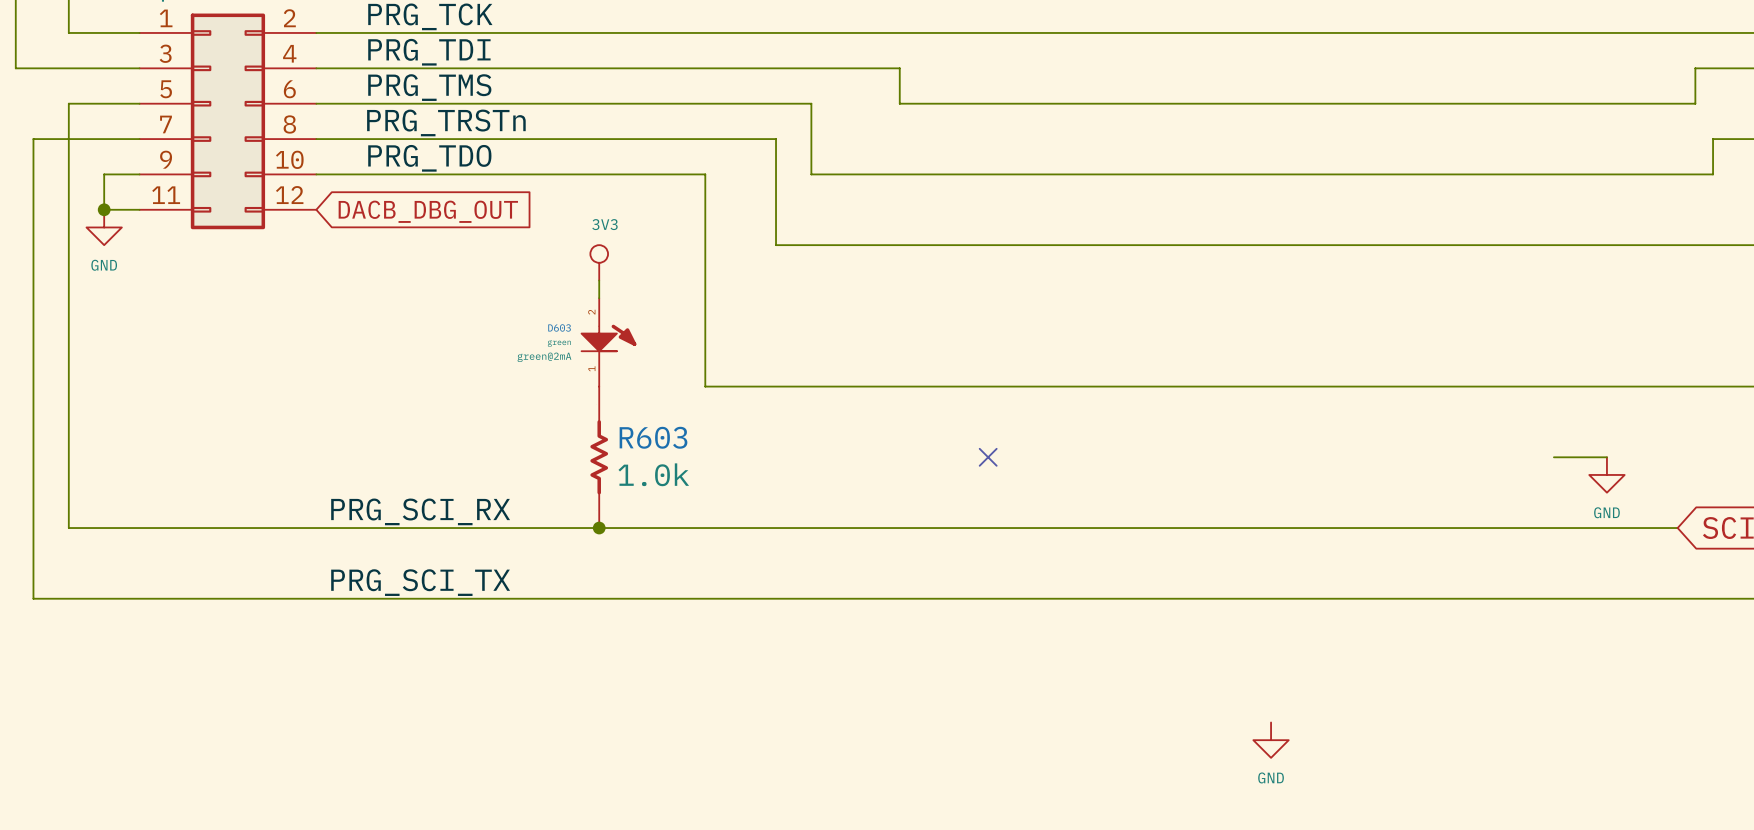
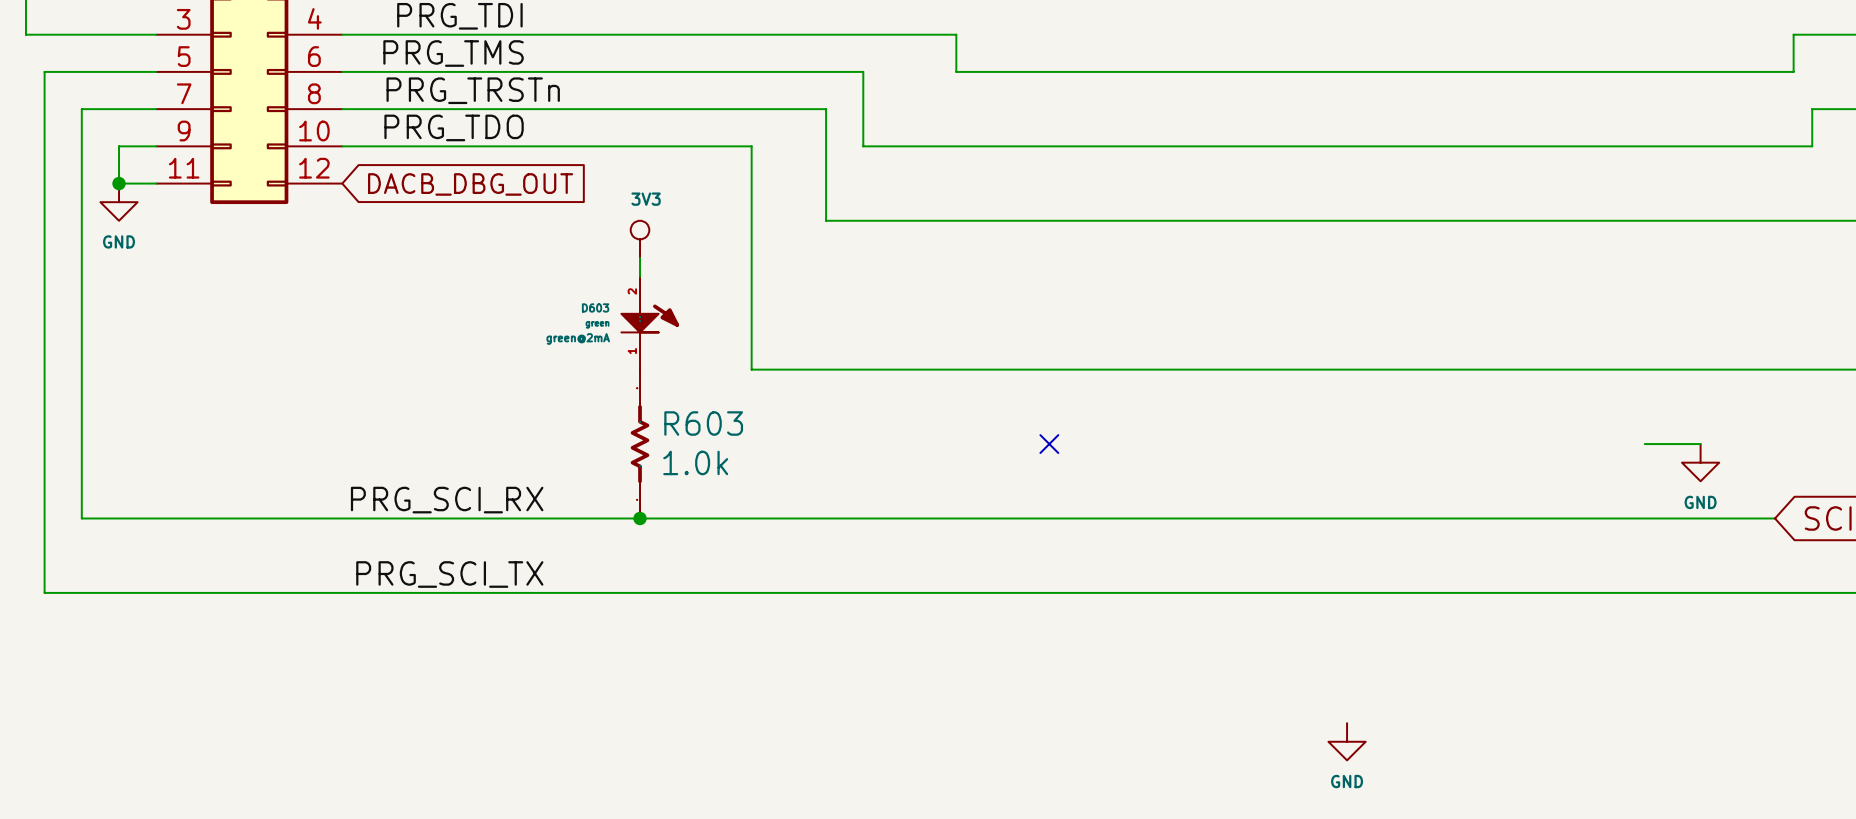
wire: (68, 103) (68, 139) (33, 139) -> (81, 71) (44, 71) (44, 109)

